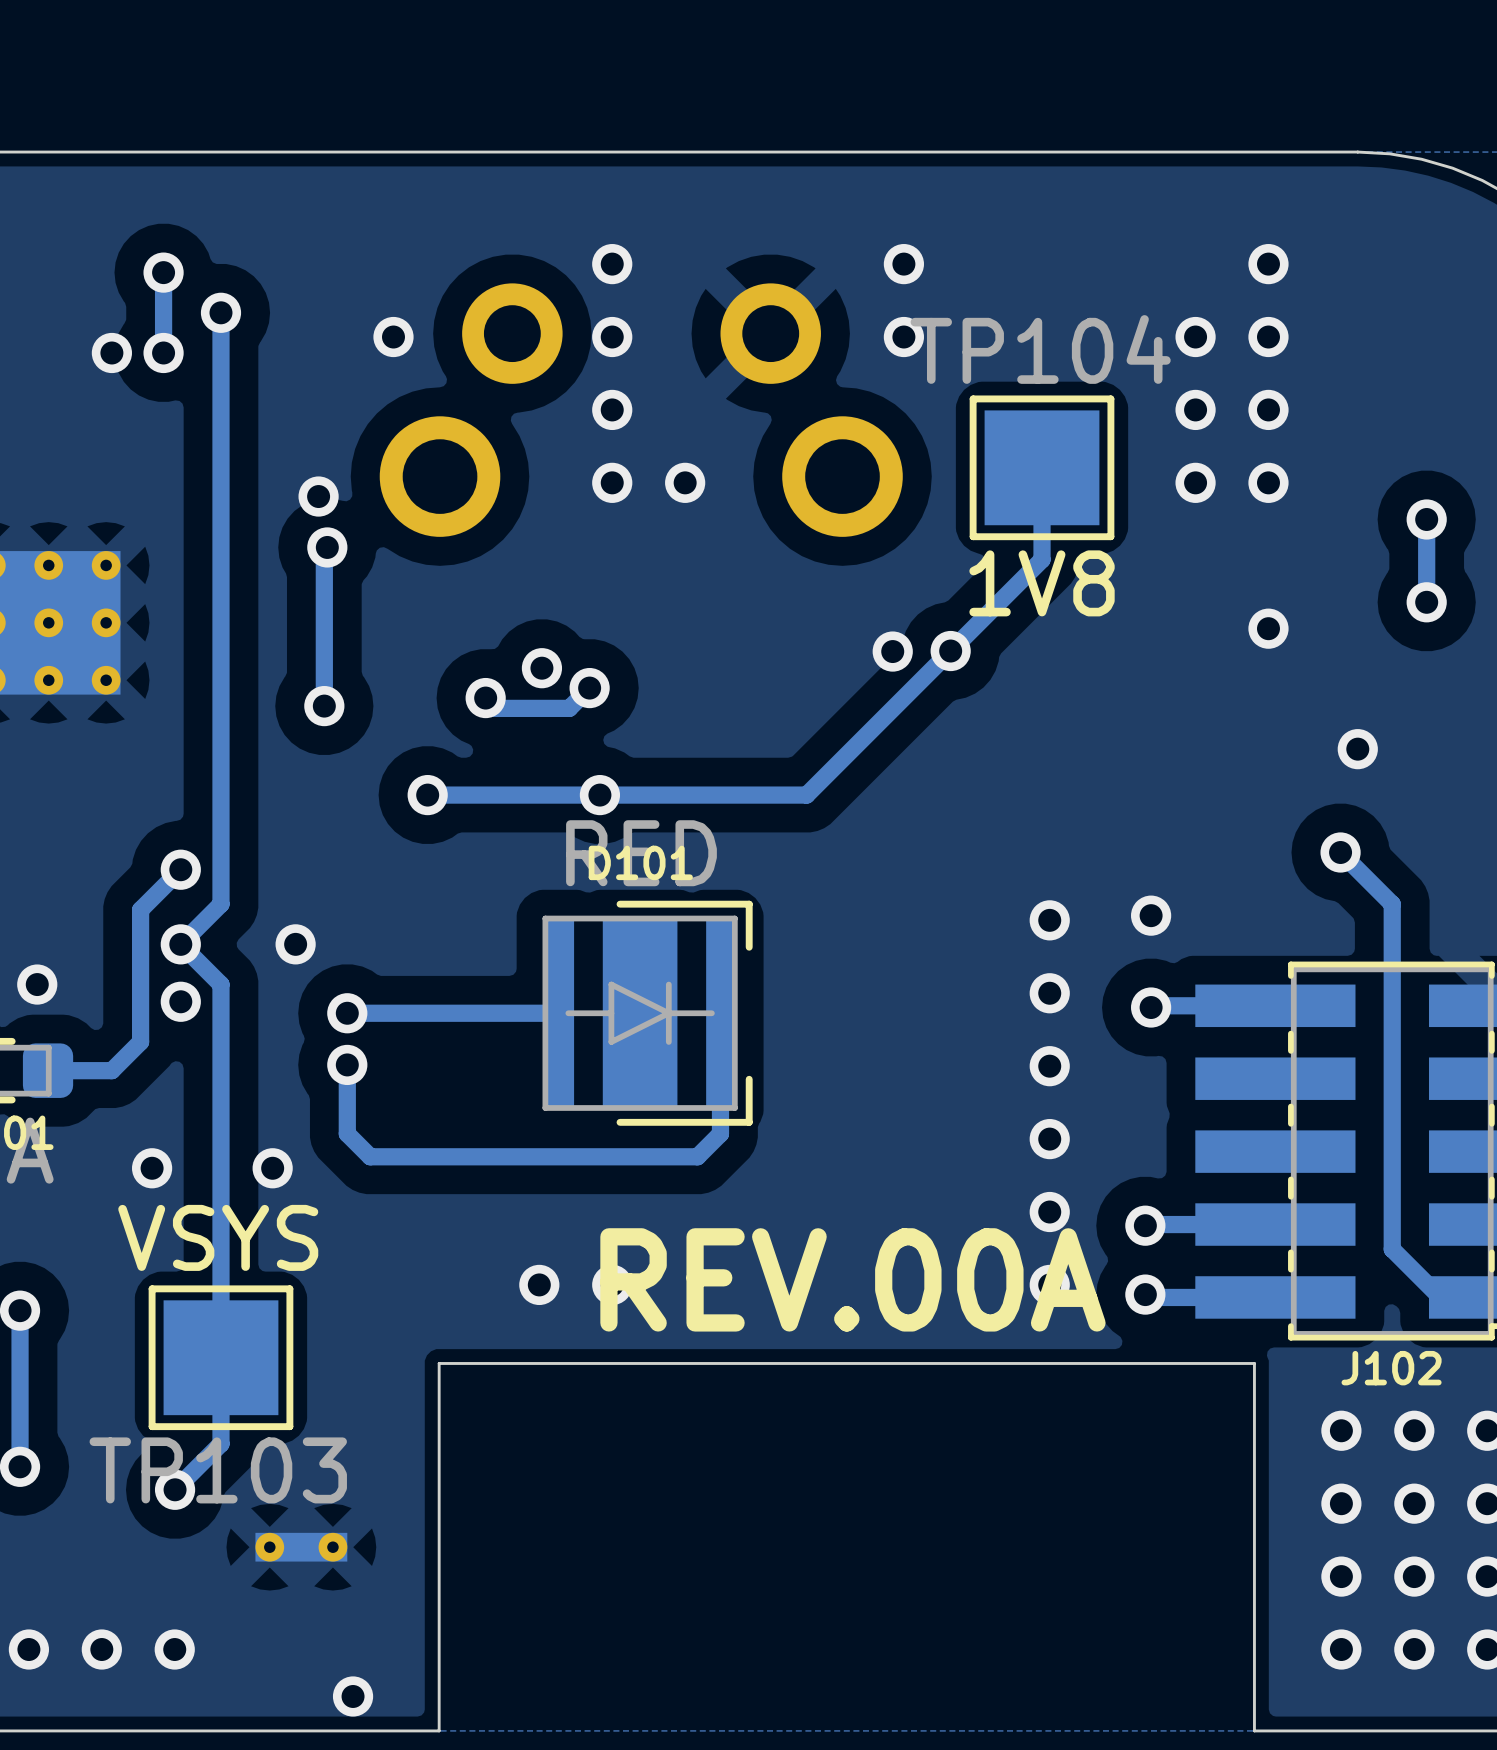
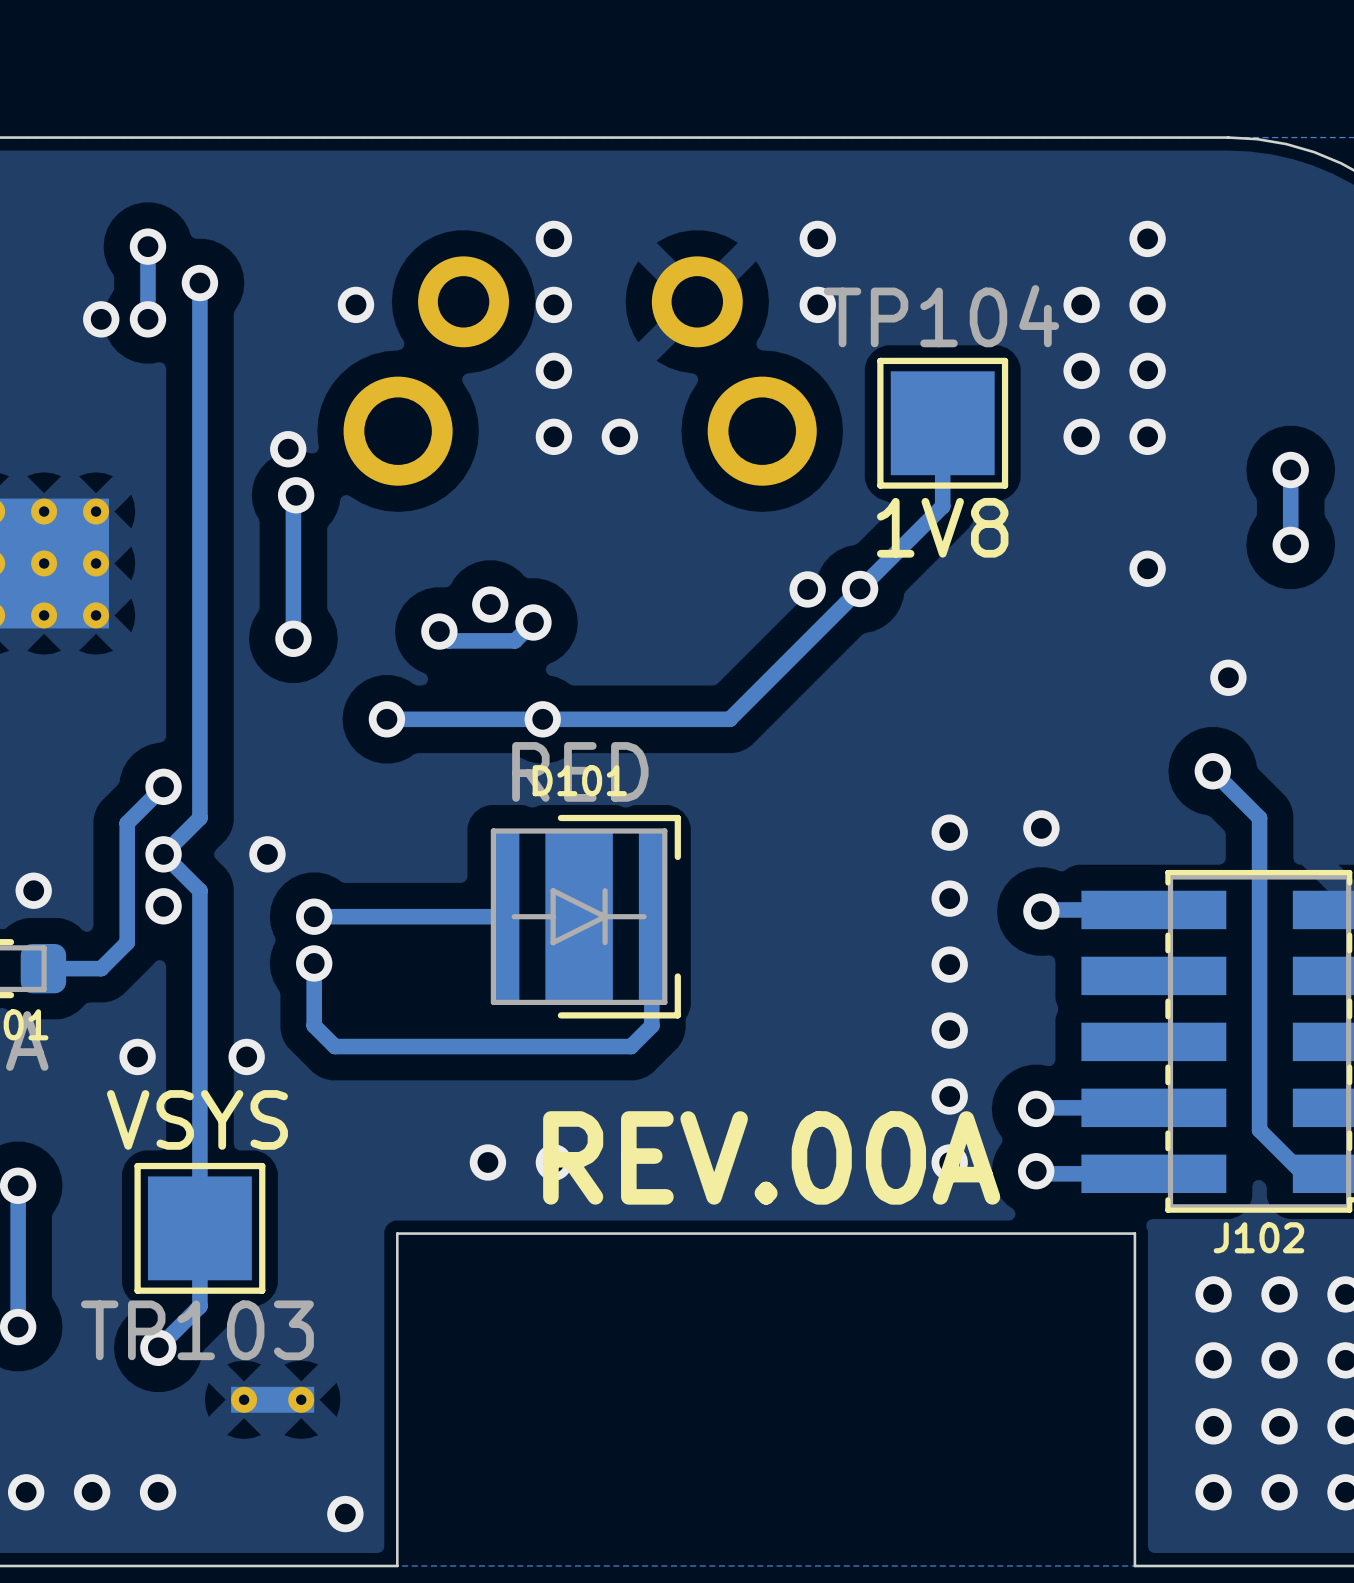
via position: (353, 1696) -> (345, 1514)

